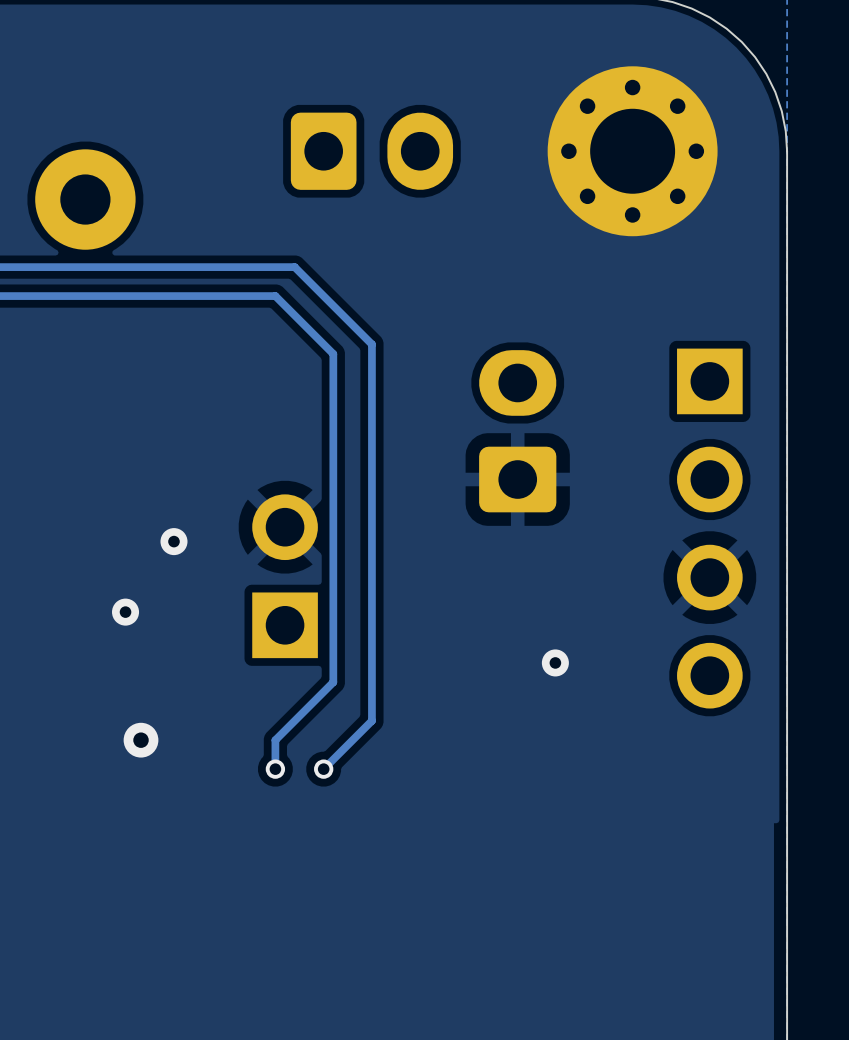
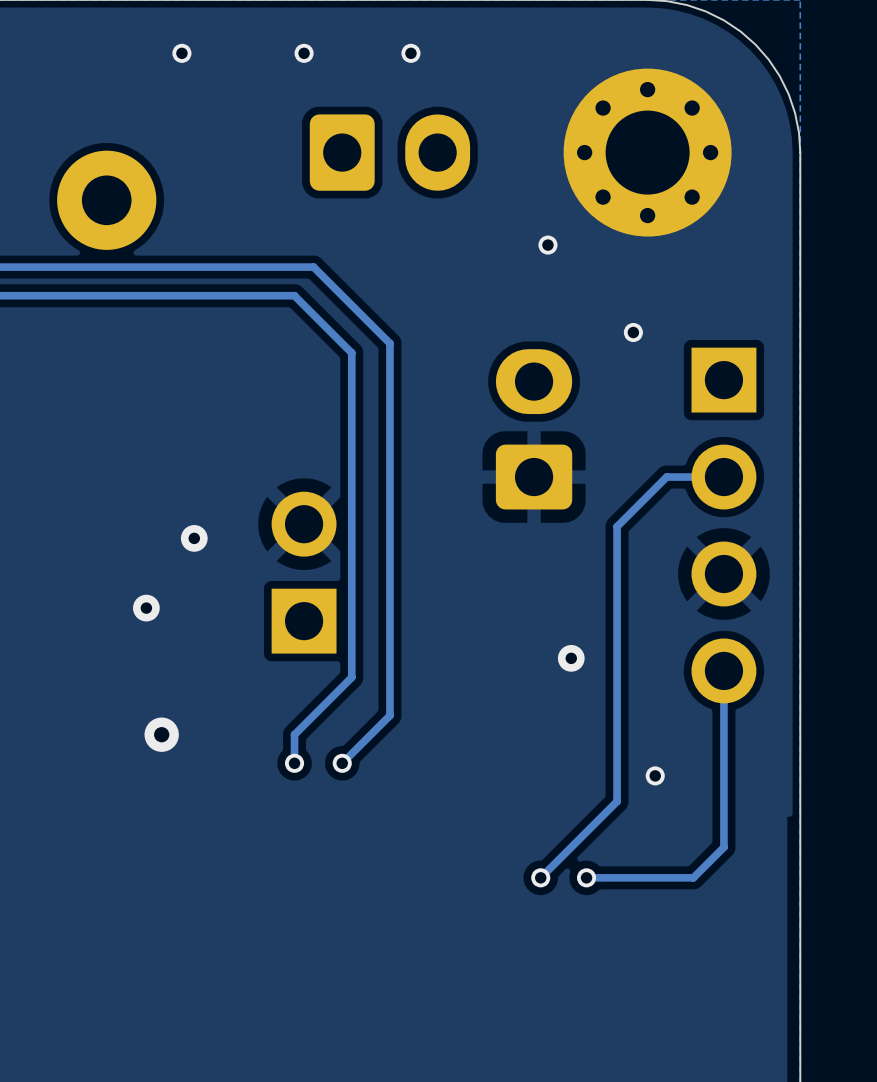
via: none -> (181, 53)
via: none -> (304, 53)
via: none -> (410, 53)
via: none -> (547, 245)
via: none -> (633, 332)
track: none -> (723, 477) (666, 477) (617, 526) (617, 801) (540, 877)
track: none -> (723, 670) (723, 847) (693, 877) (586, 877)
via: none -> (655, 775)
via: none -> (540, 877)
via: none -> (586, 877)

